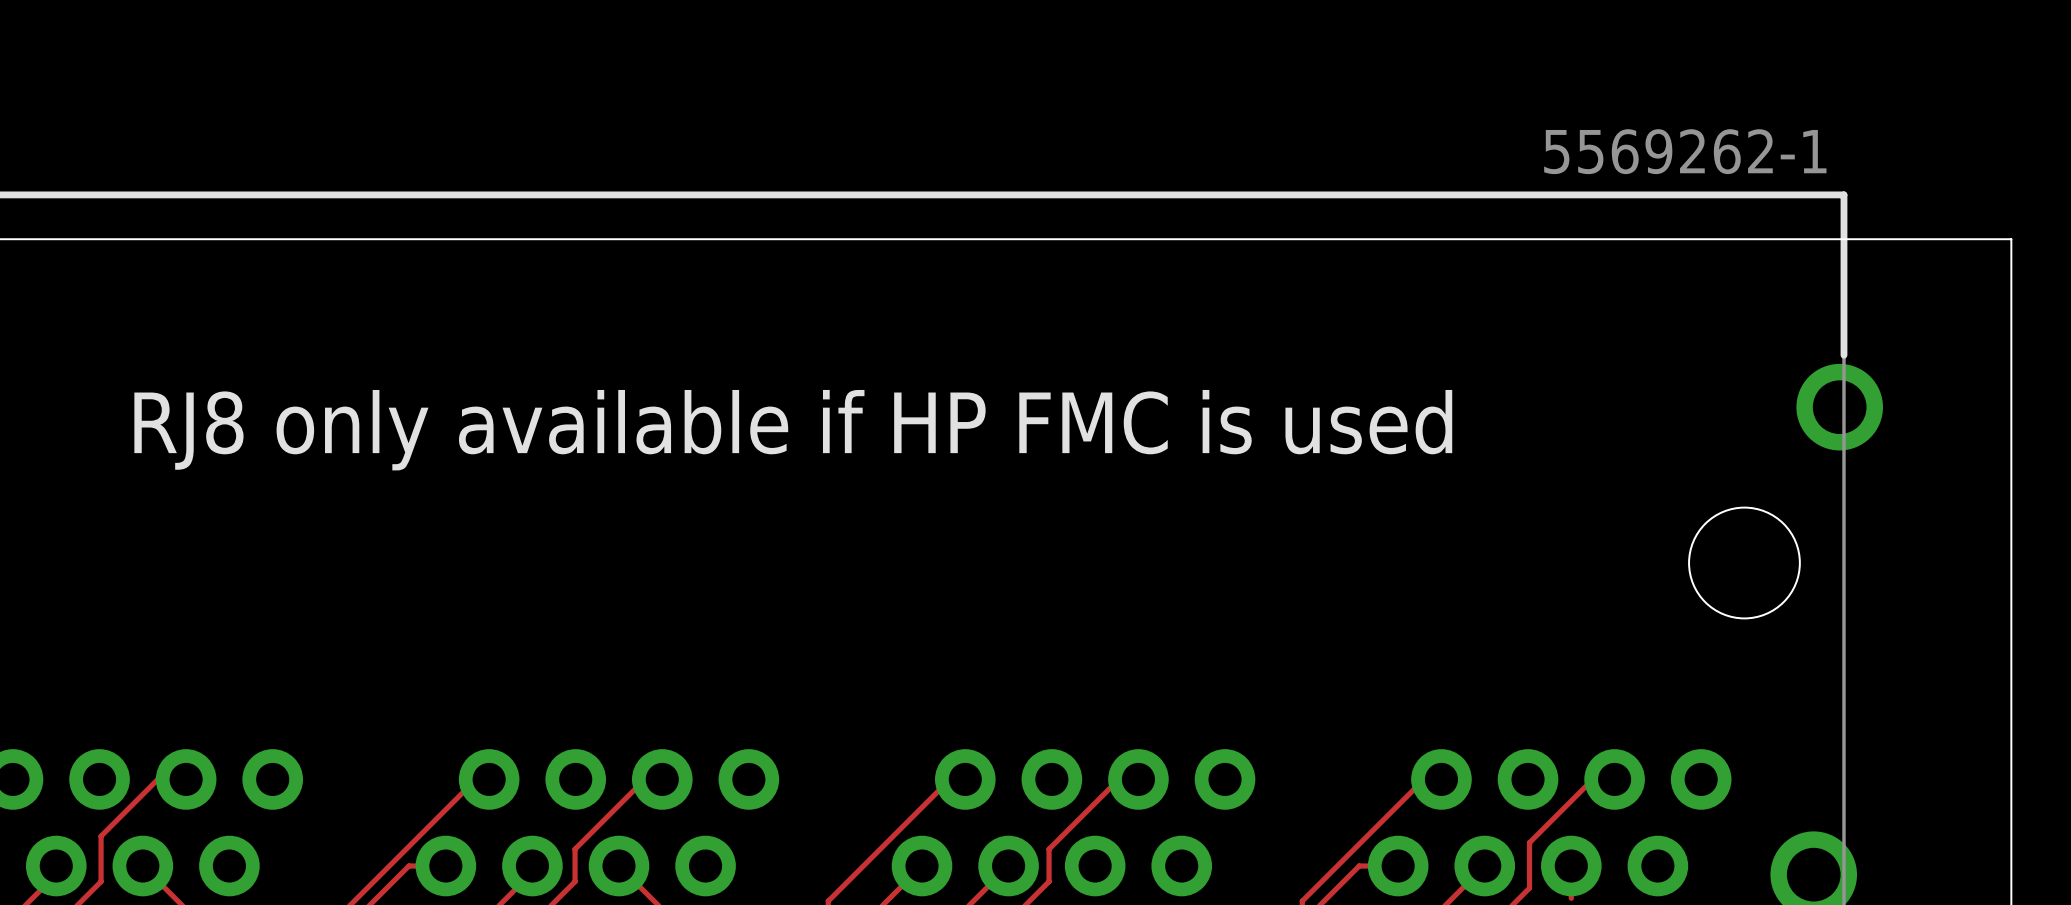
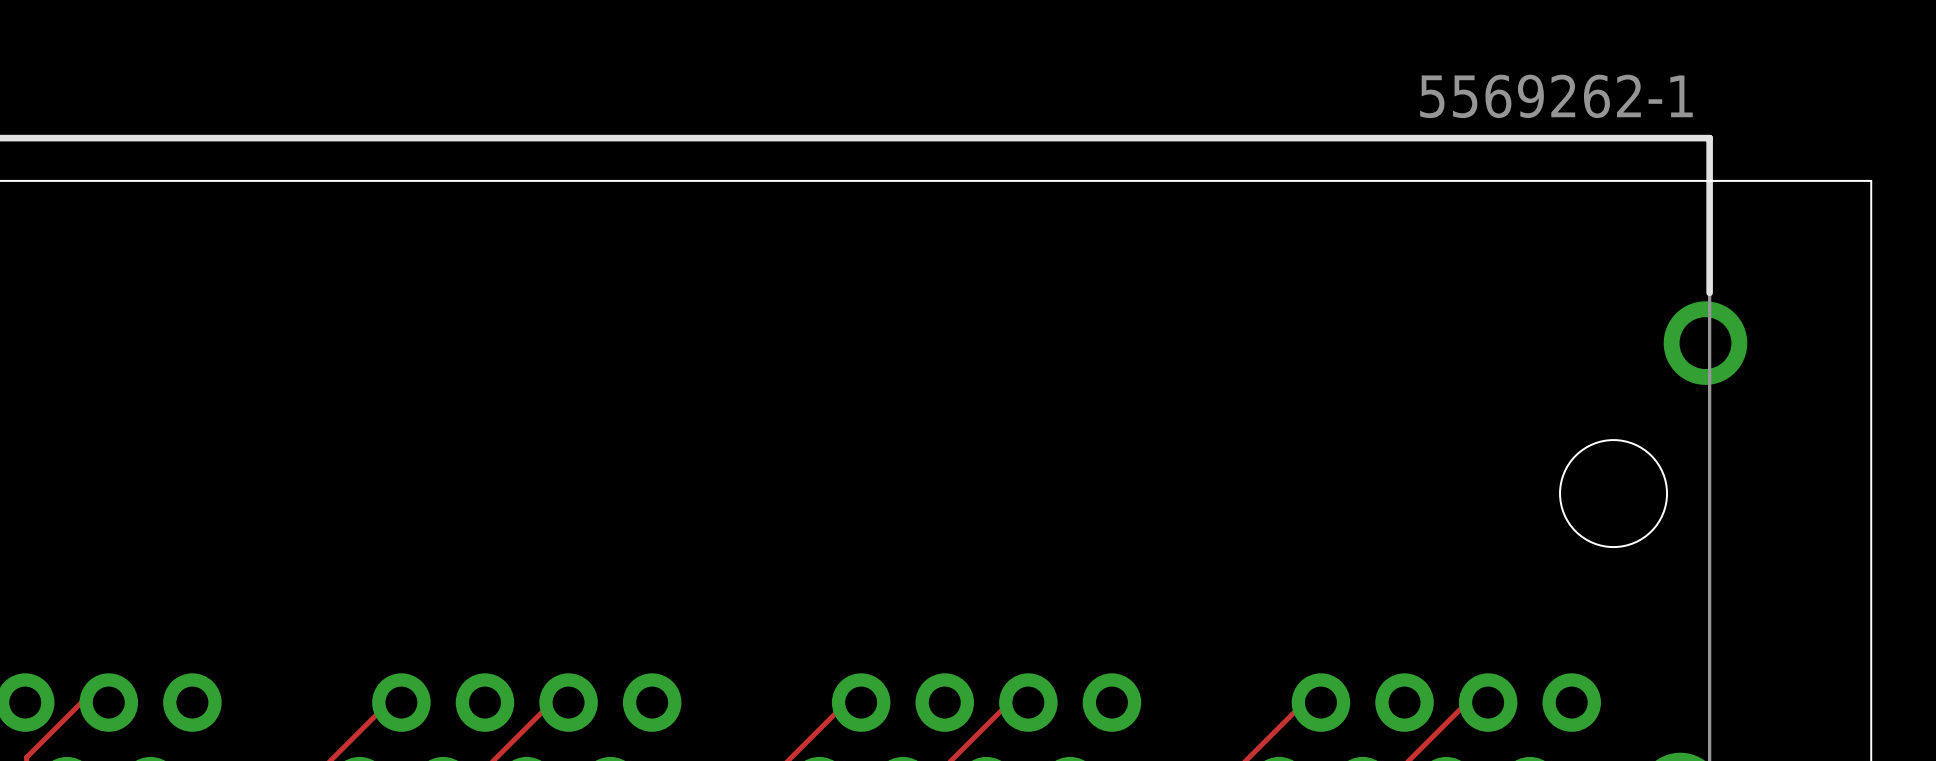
text: RJ8 only available if HP FMC is used (793, 430) -> none

